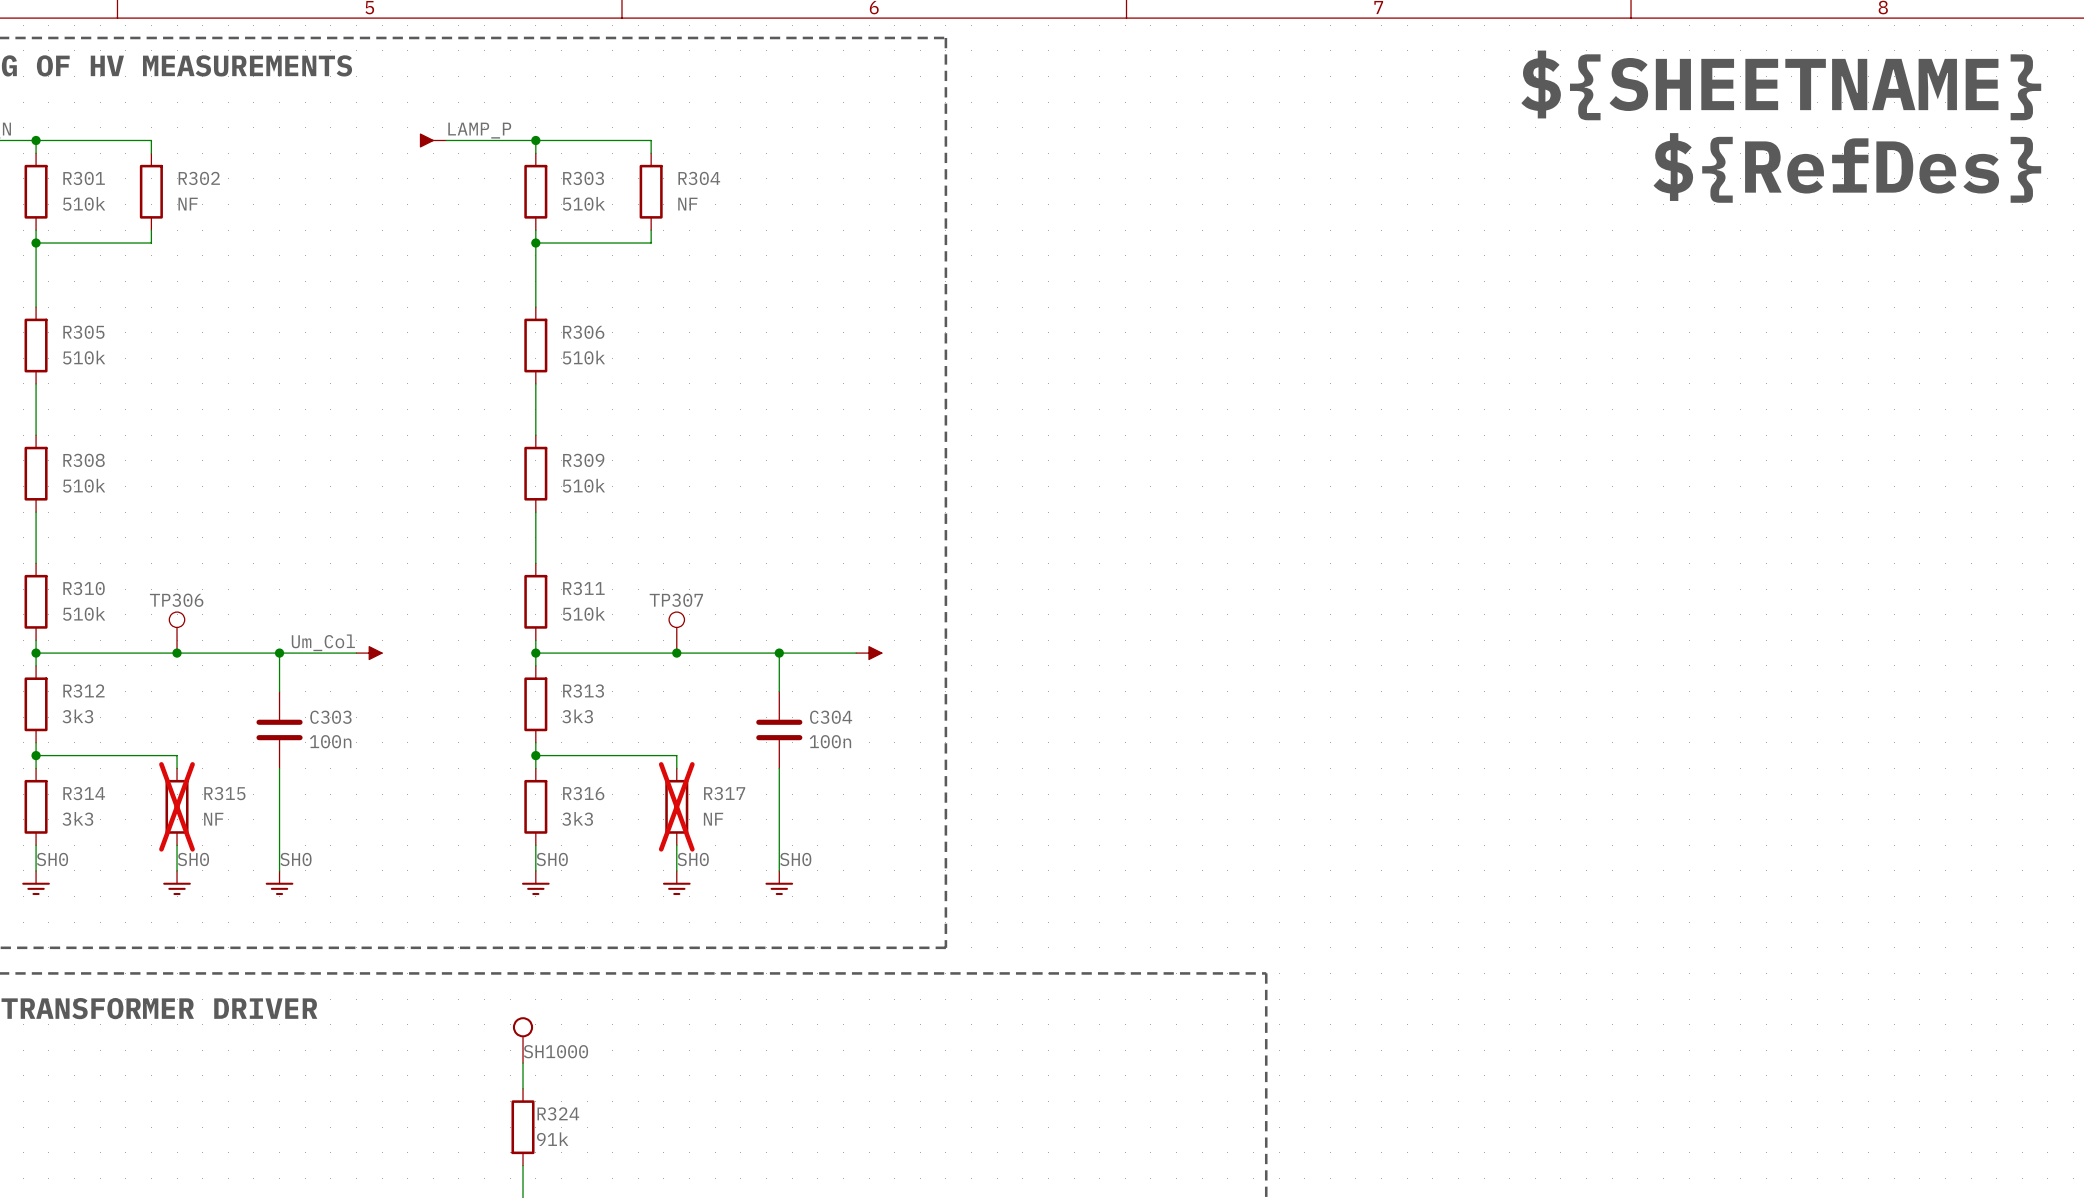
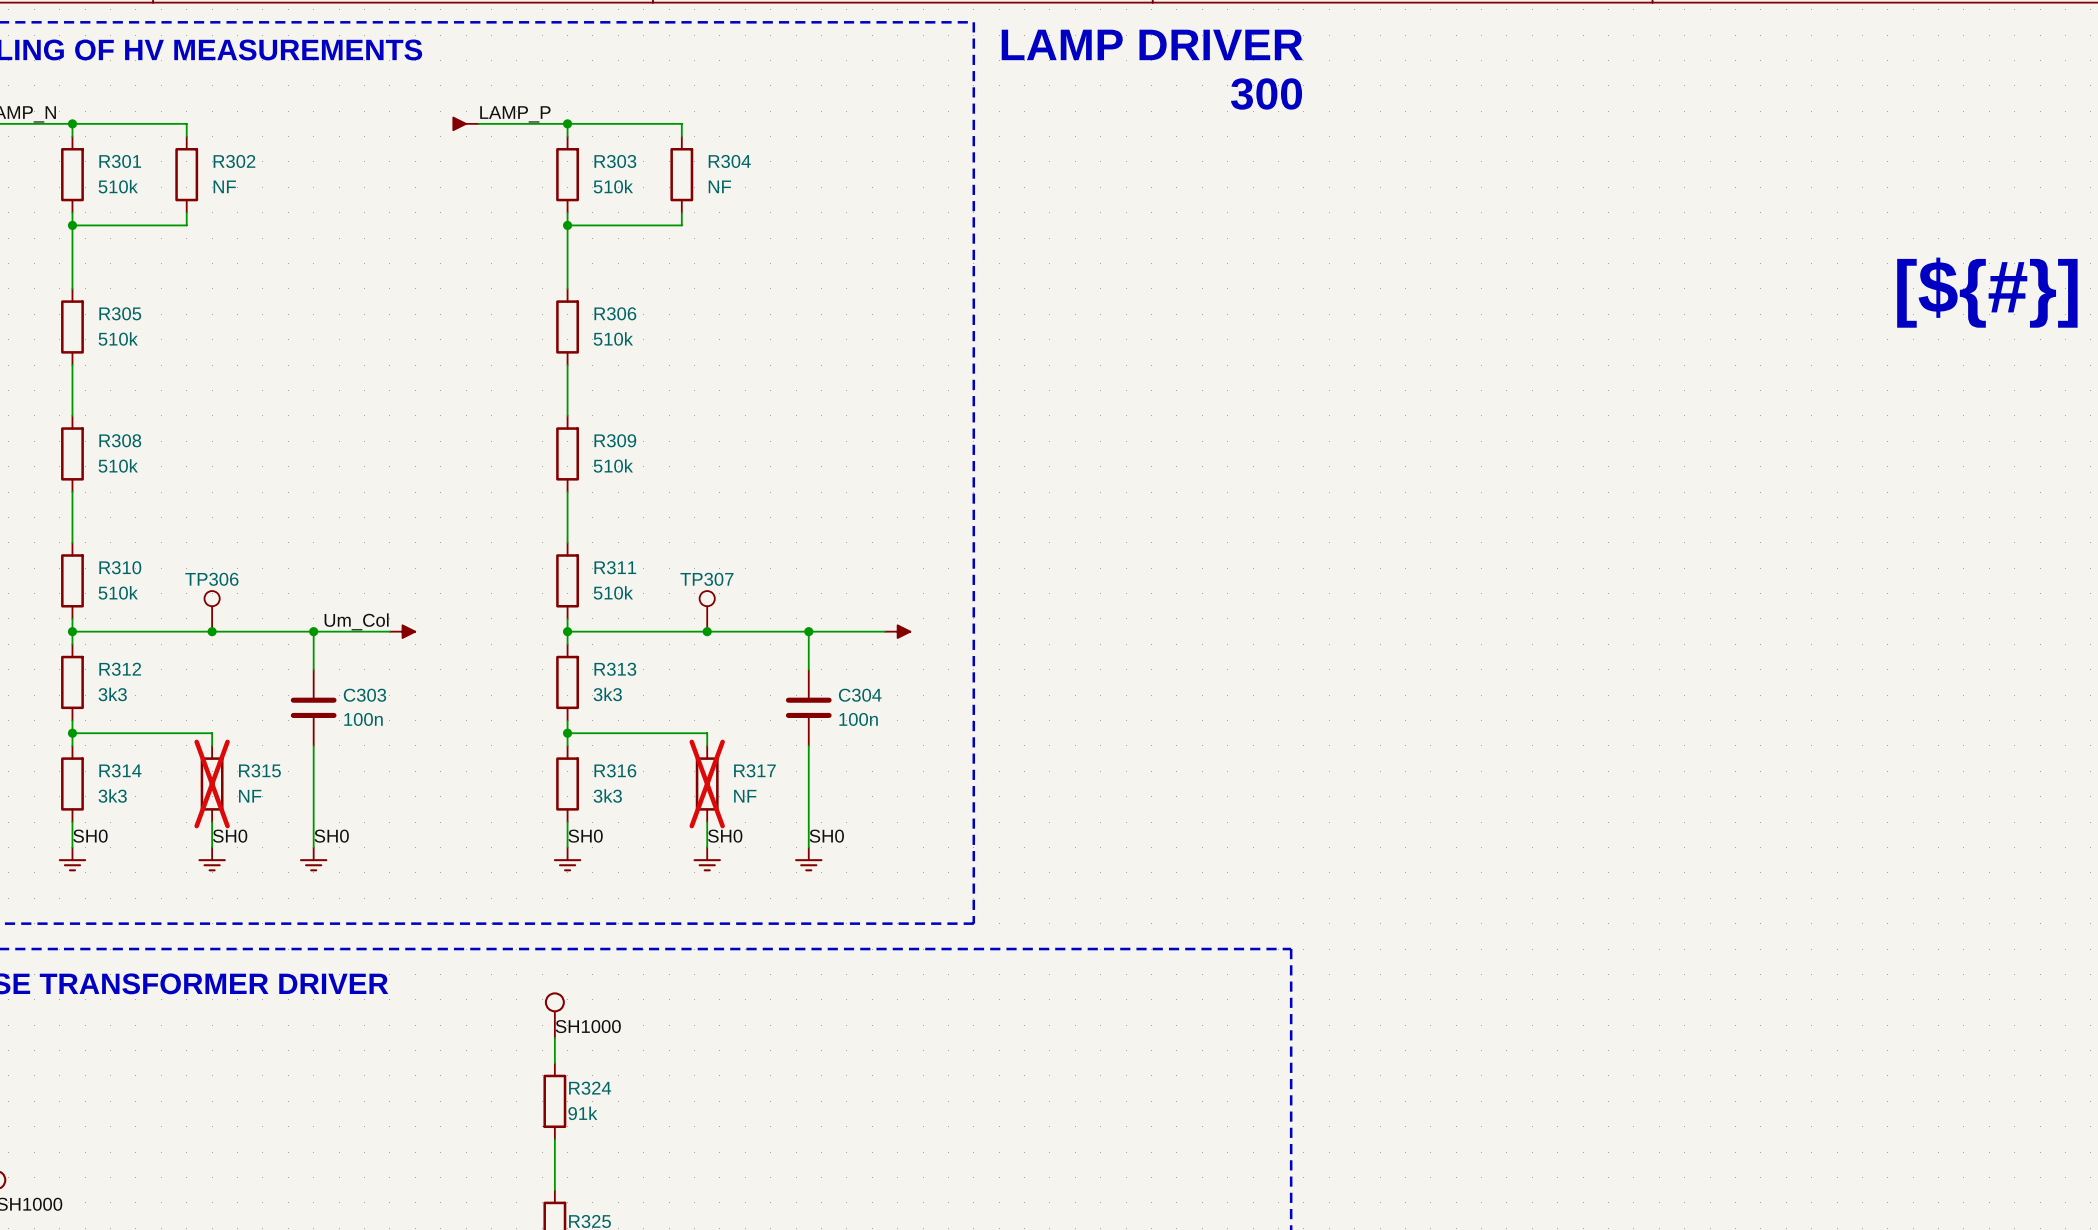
text: none -> LAMP DRIVER (1152, 44)
text: ${SHEETNAME} (1781, 85) -> none
text: none -> 300 (1266, 94)
text: ${RefDes} (1847, 167) -> none
text: none -> [${#}] (1987, 292)

